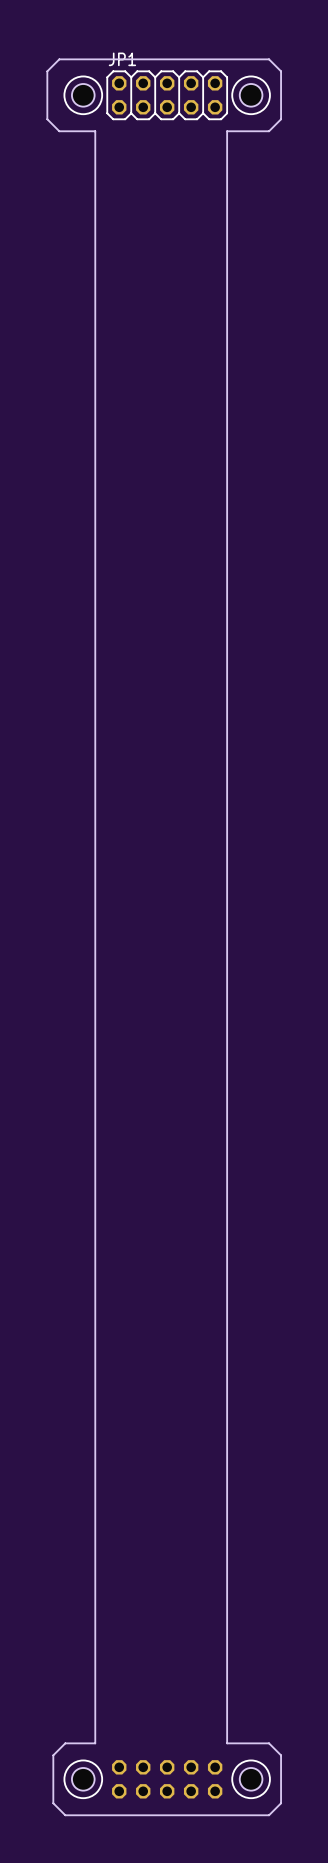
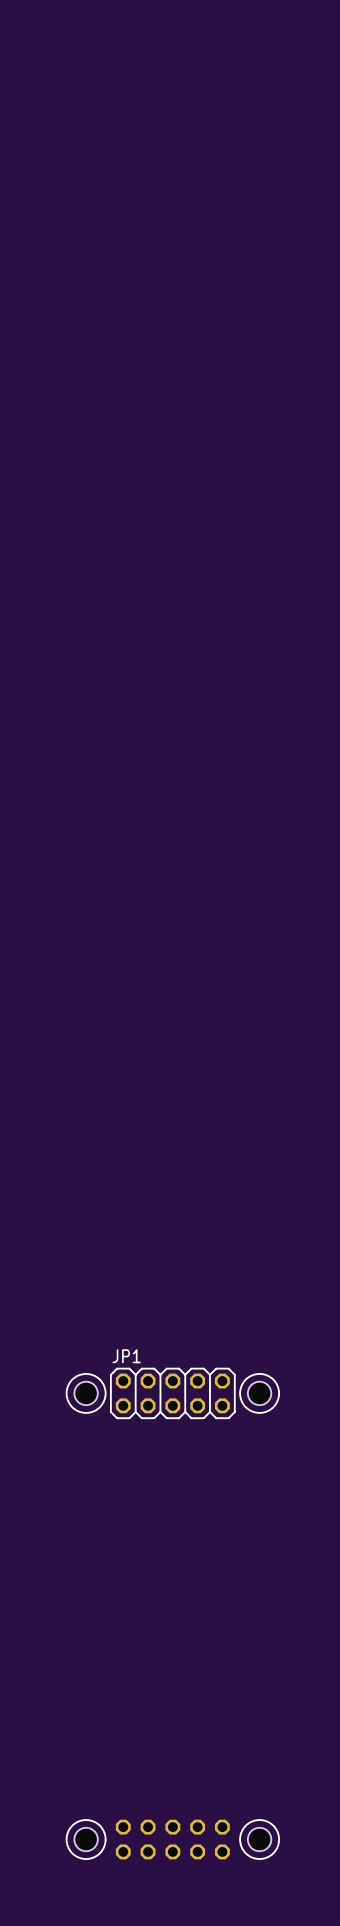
board edge: (59, 59) (47, 71) (47, 119) (59, 131) (95, 131) (95, 1743) (65, 1743) (53, 1755) (53, 1803) (65, 1815) (269, 1815) (281, 1803) (281, 1755) (269, 1743) (227, 1743) (227, 131) (269, 131) (281, 119) (281, 71) (269, 59) (59, 59) -> none
drawing: [63, 75, 103, 115] -> none
drawing: [231, 75, 271, 115] -> none
hole: (83, 95) -> none
JP1 position: (167, 95) -> (172, 1393)
hole: (251, 95) -> none
drawing: none -> [65, 1373, 107, 1414]
drawing: none -> [239, 1373, 280, 1414]
hole: none -> (86, 1393)
hole: none -> (259, 1393)

